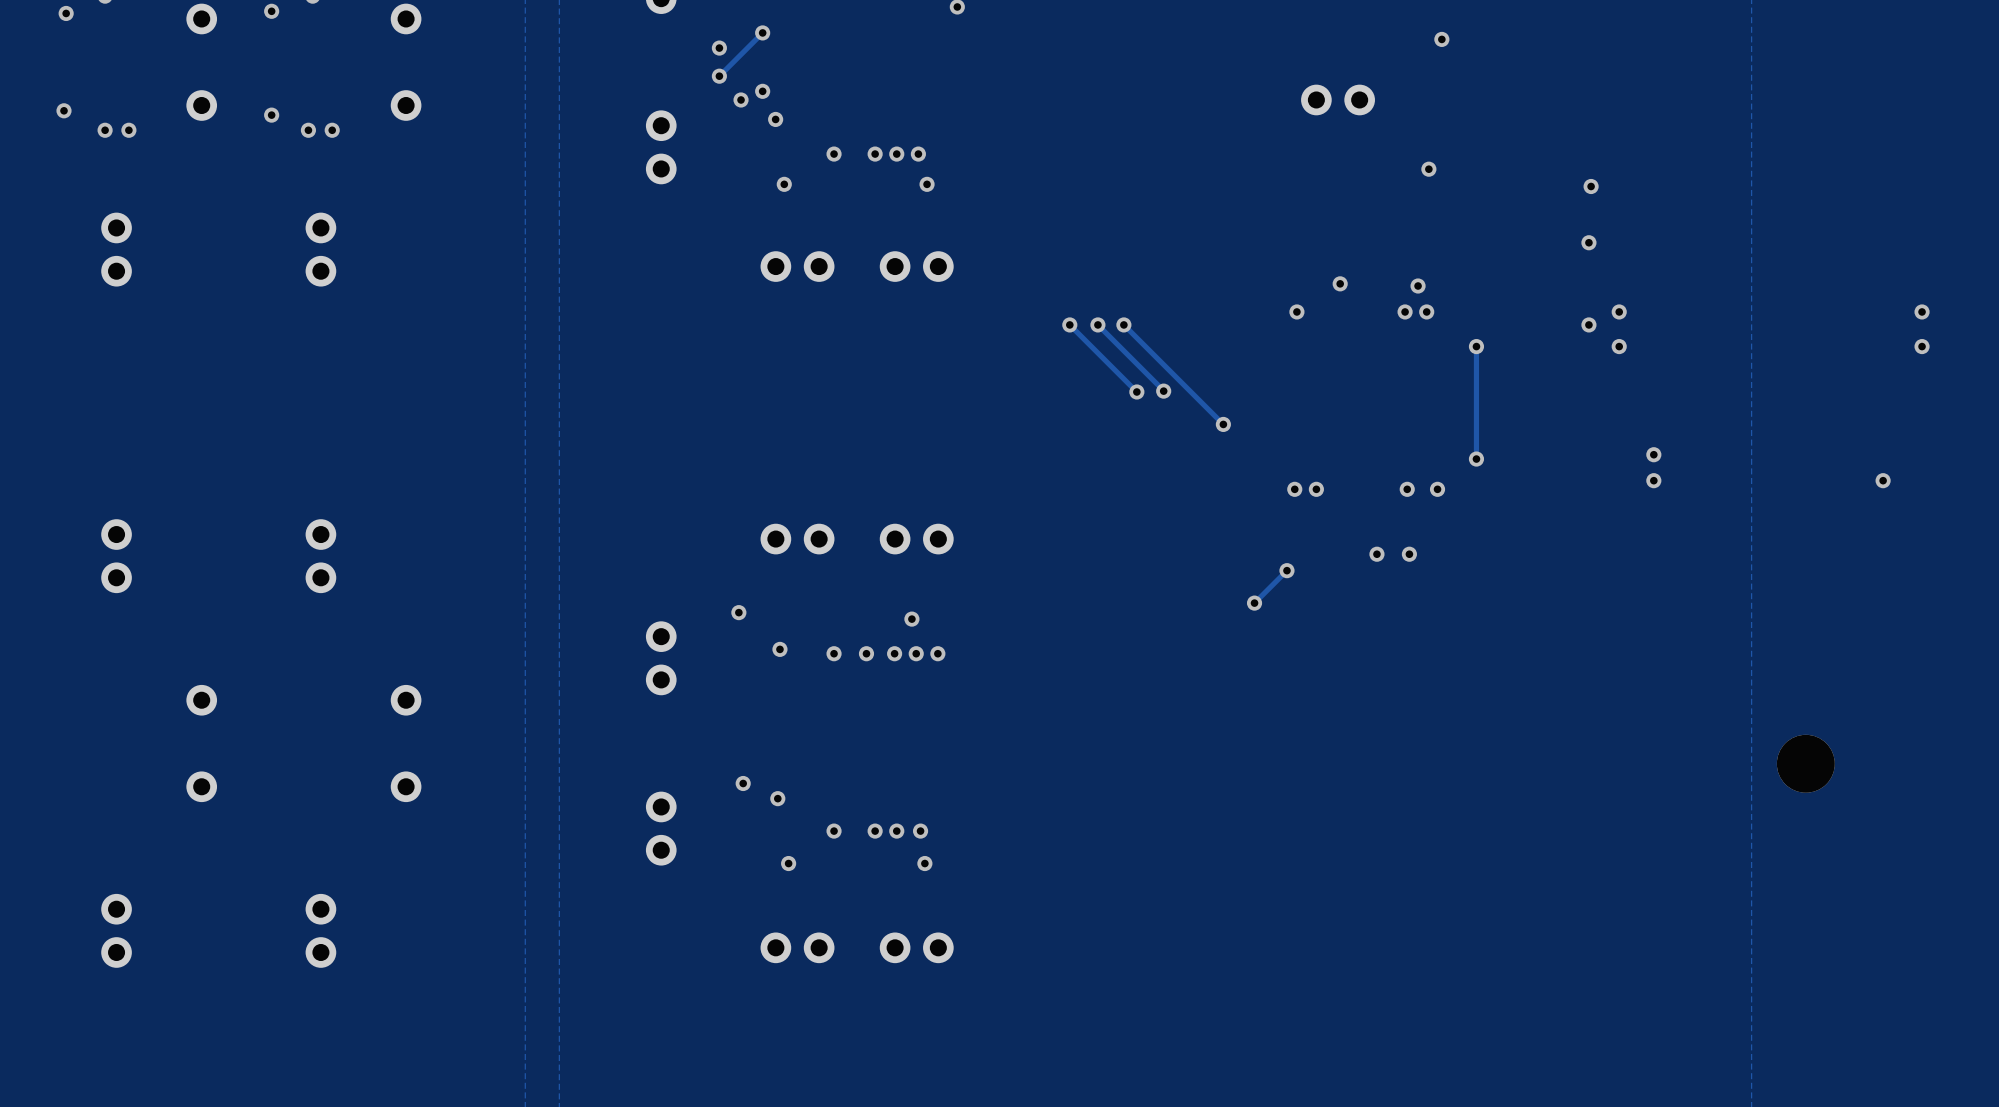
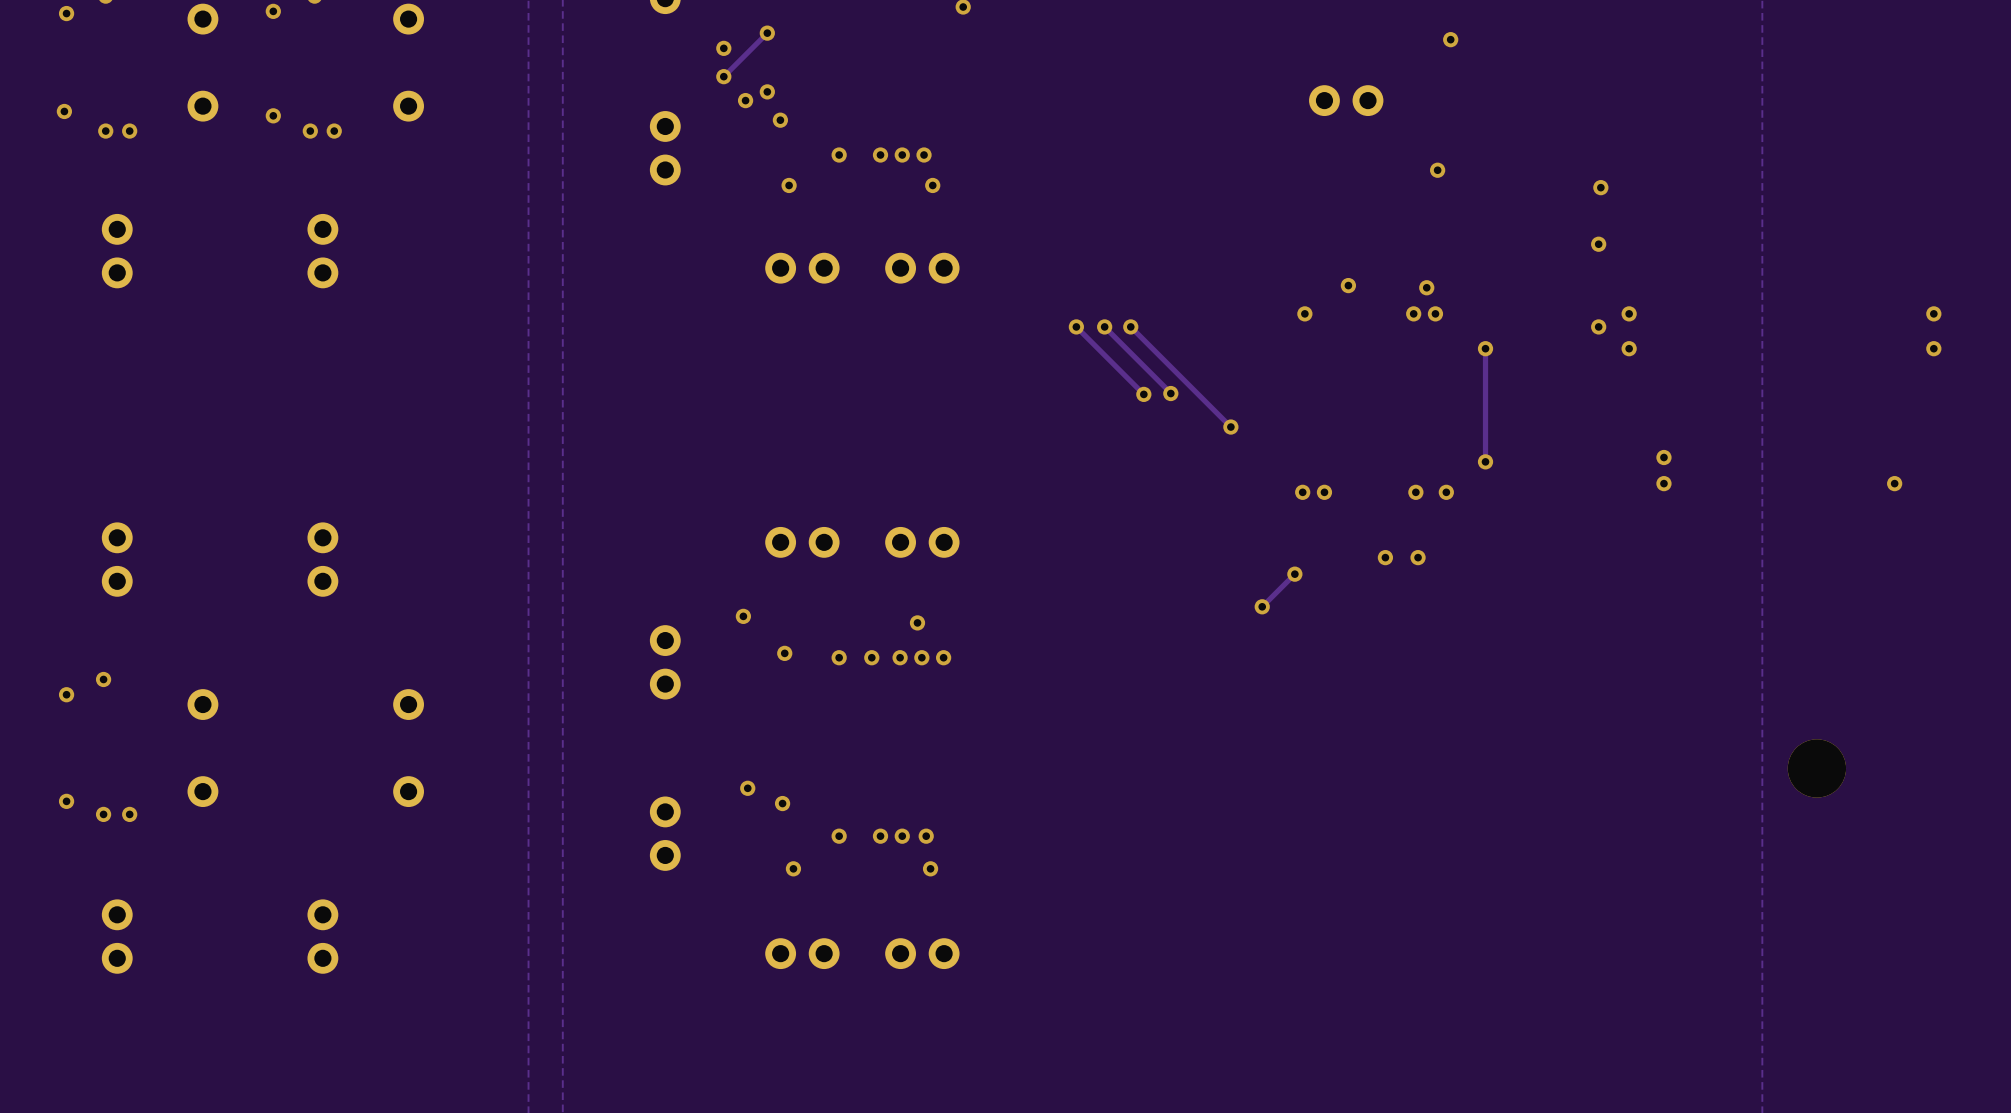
via: none -> (103, 679)
via: none -> (66, 694)
via: none -> (66, 801)
via: none -> (103, 814)
via: none -> (129, 814)

